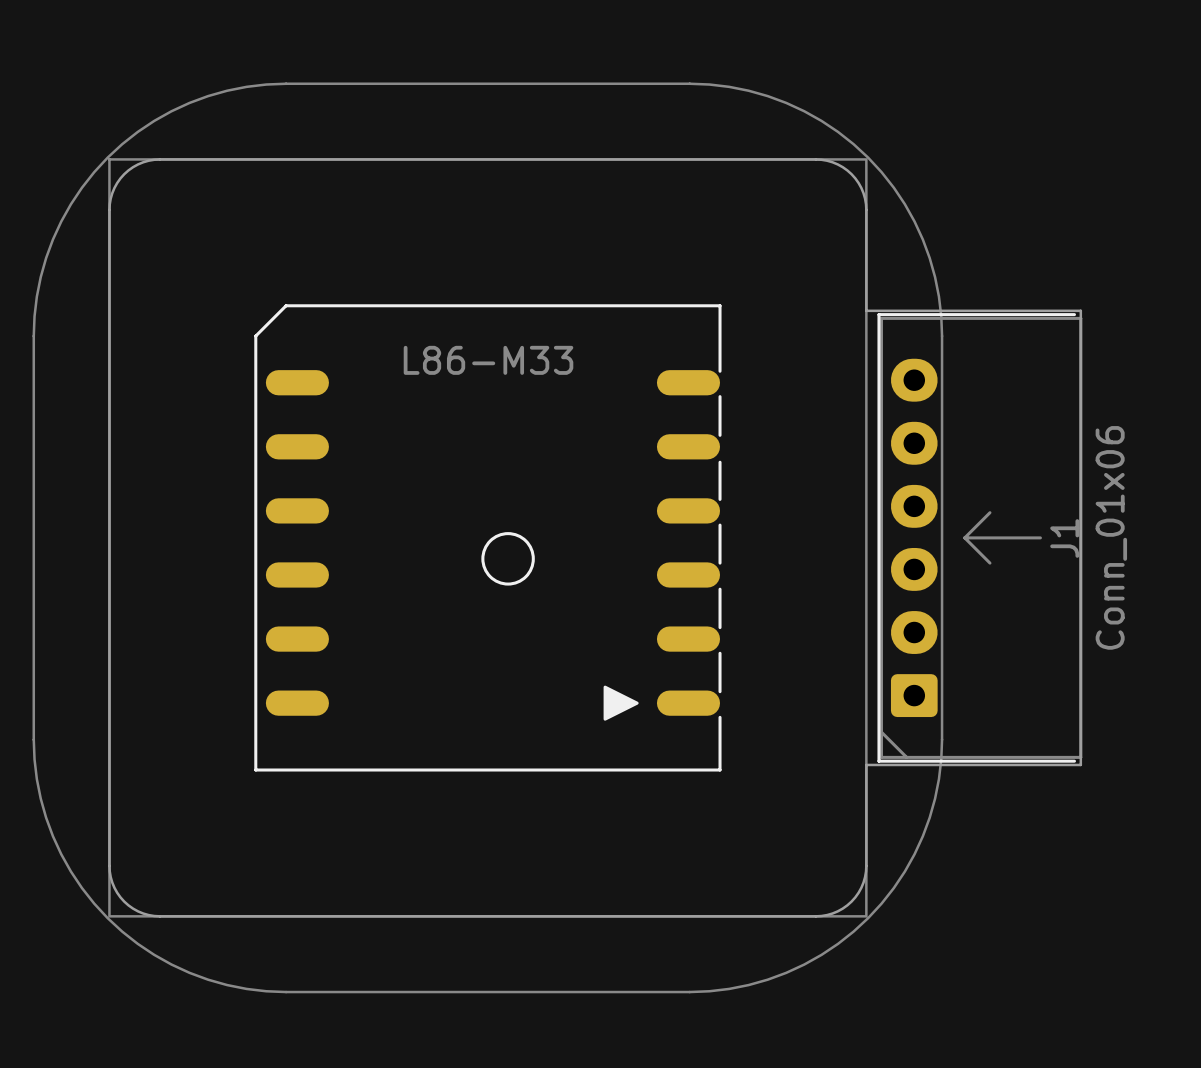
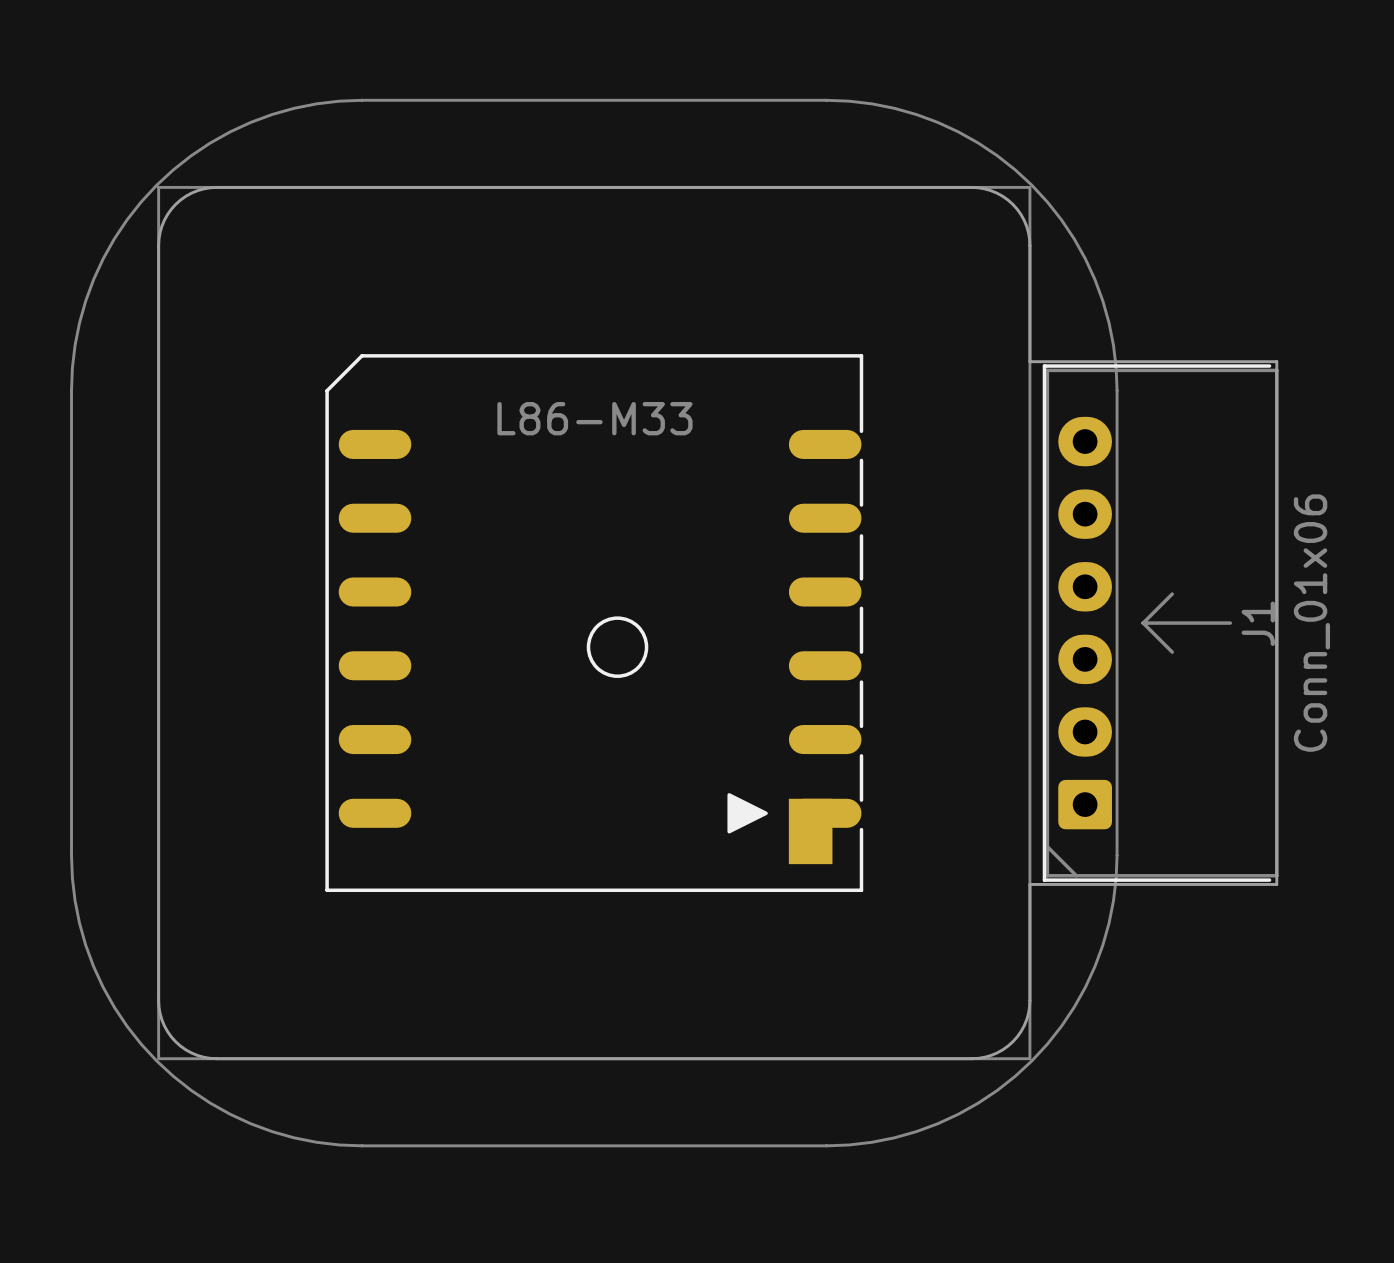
part footprint: [32, 82, 944, 994] -> [70, 98, 1119, 1148]

